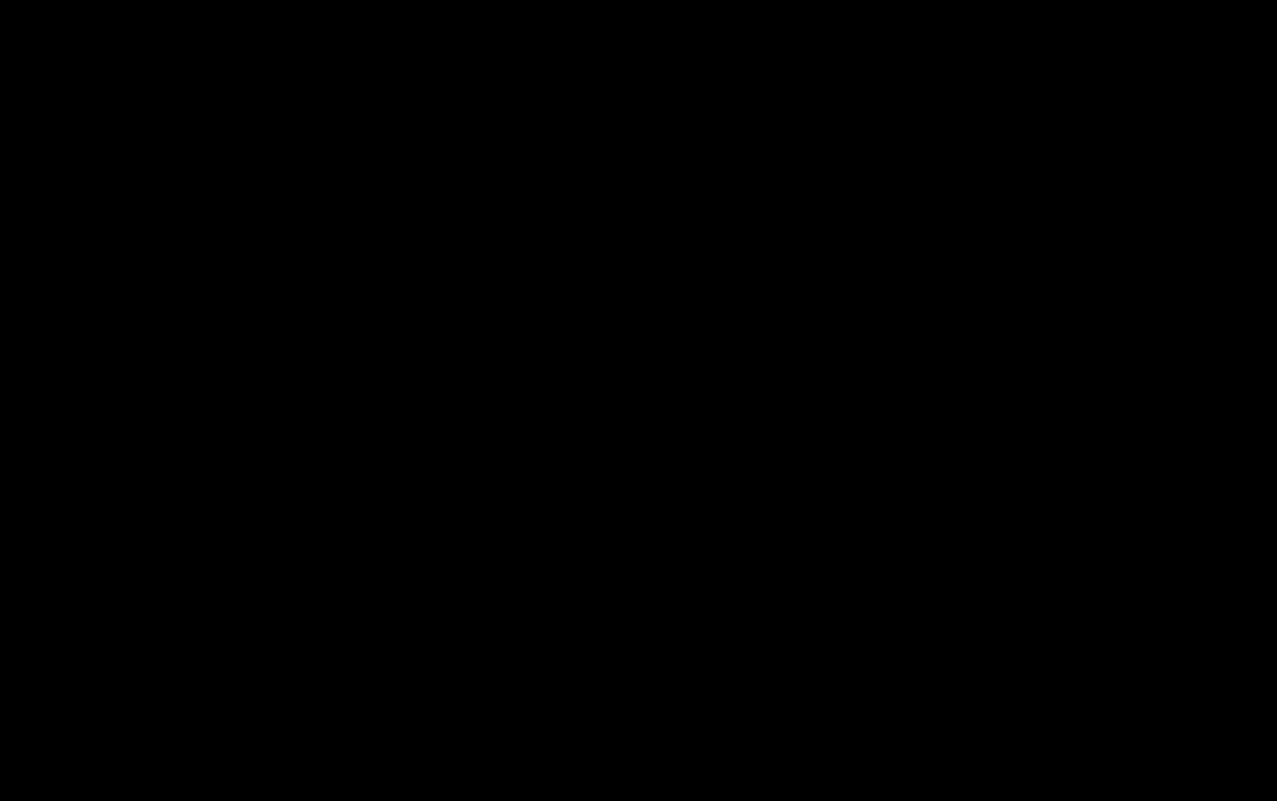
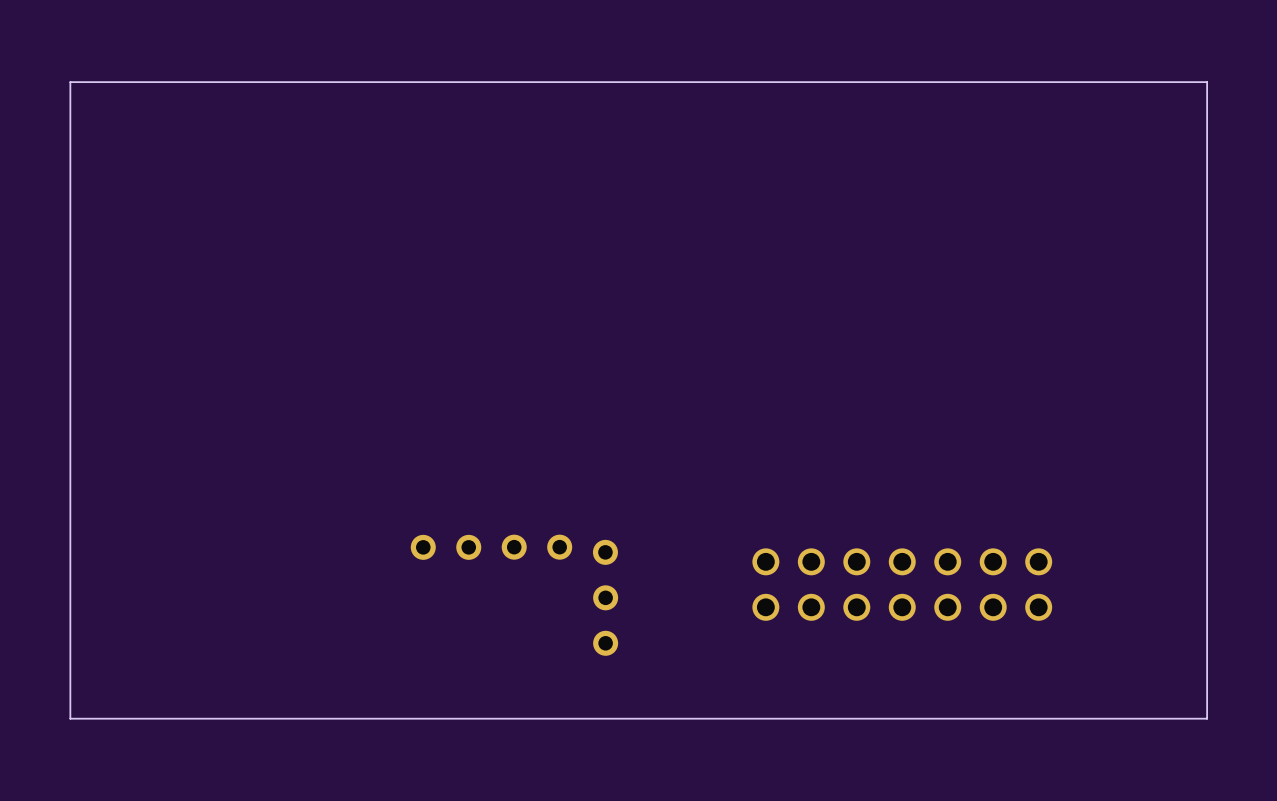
board edge: none -> (1207, 82) (1207, 718) (70, 718) (70, 82) (1207, 82)
part: none -> (491, 547)
part: none -> (902, 584)
part: none -> (605, 597)

